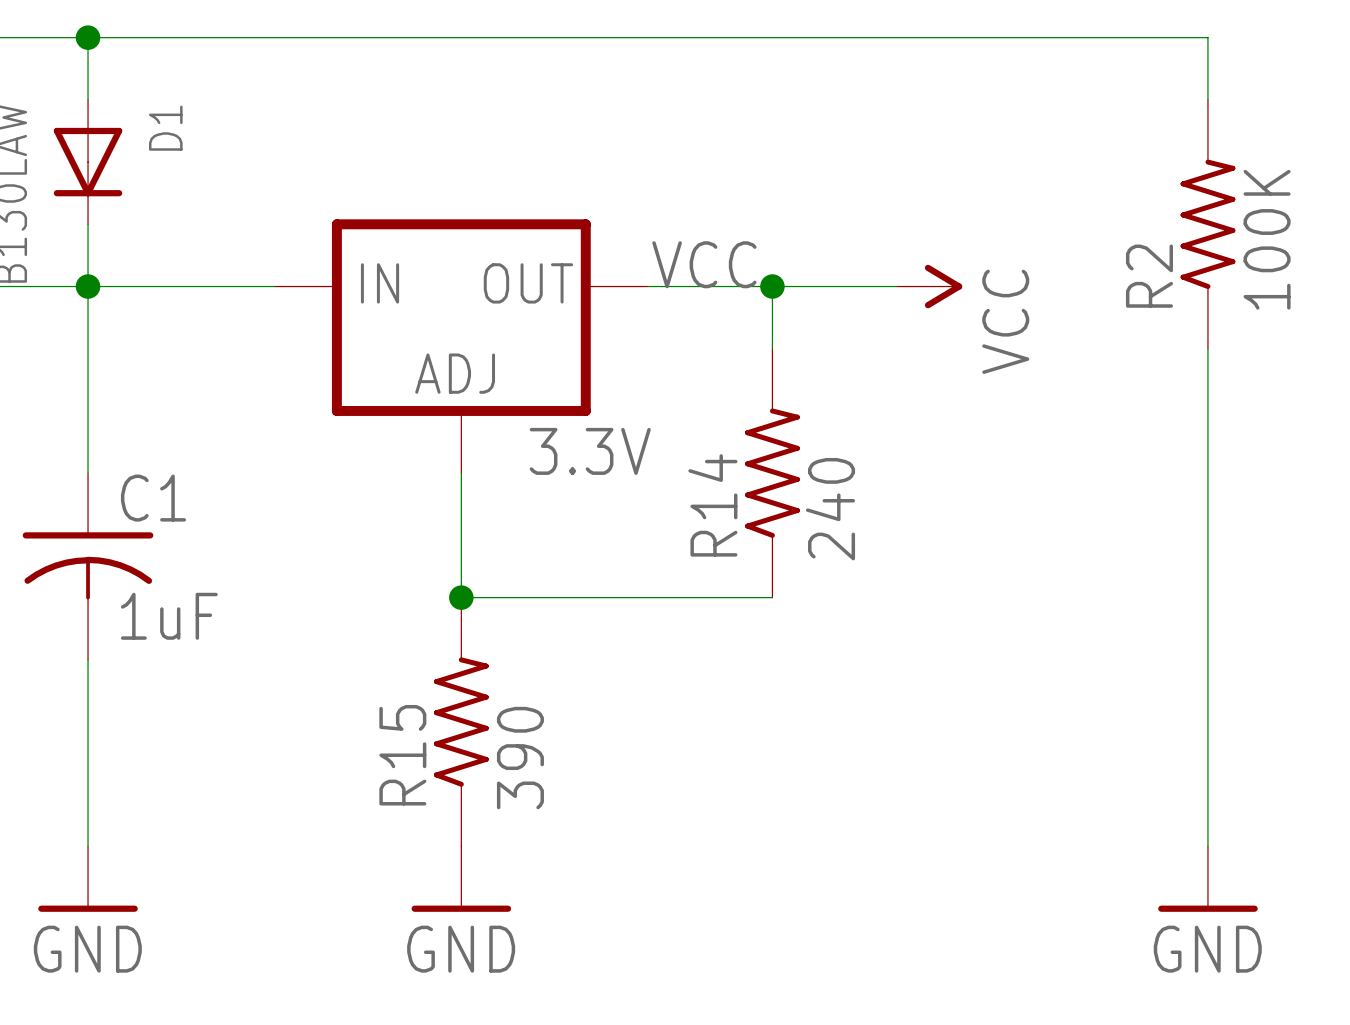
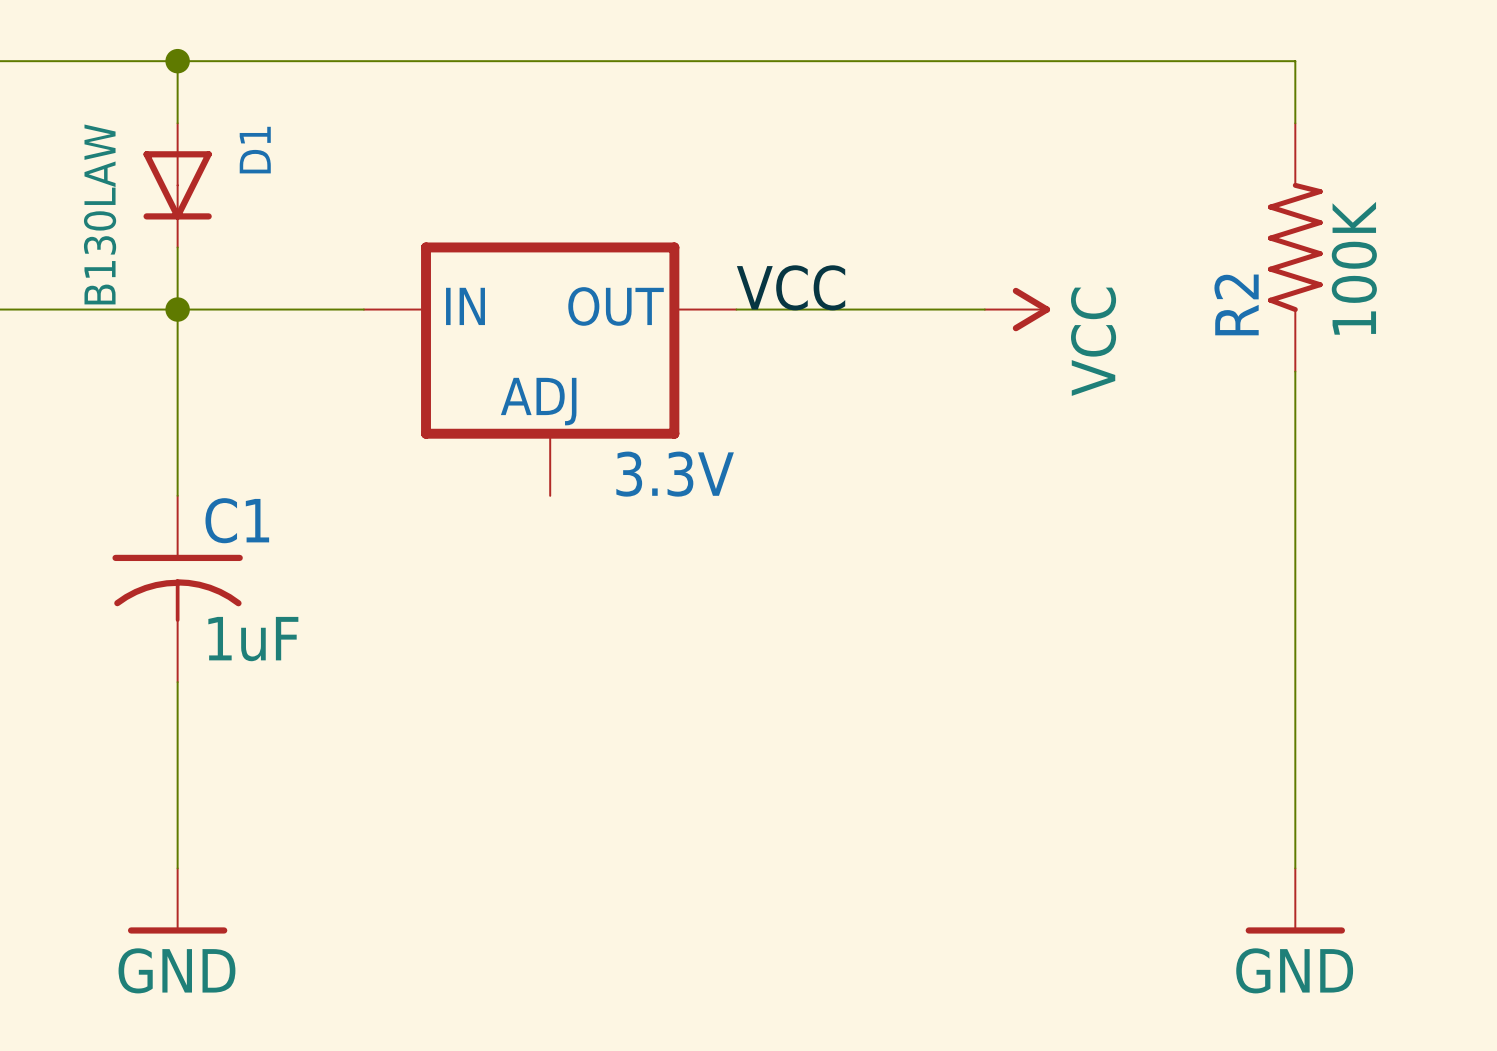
wire: (772, 286) (772, 348) -> none
junction: (772, 286) -> none
wire: (461, 473) (461, 597) (772, 597) -> none
R14: 240 (772, 473) -> none
junction: (461, 597) -> none
R15: 390 (461, 722) -> none
power symbol: GND (461, 879) -> none

